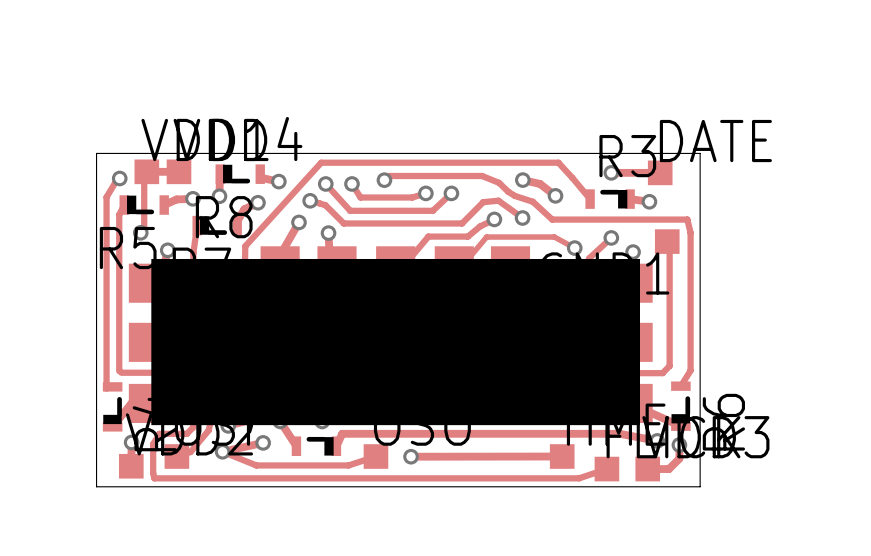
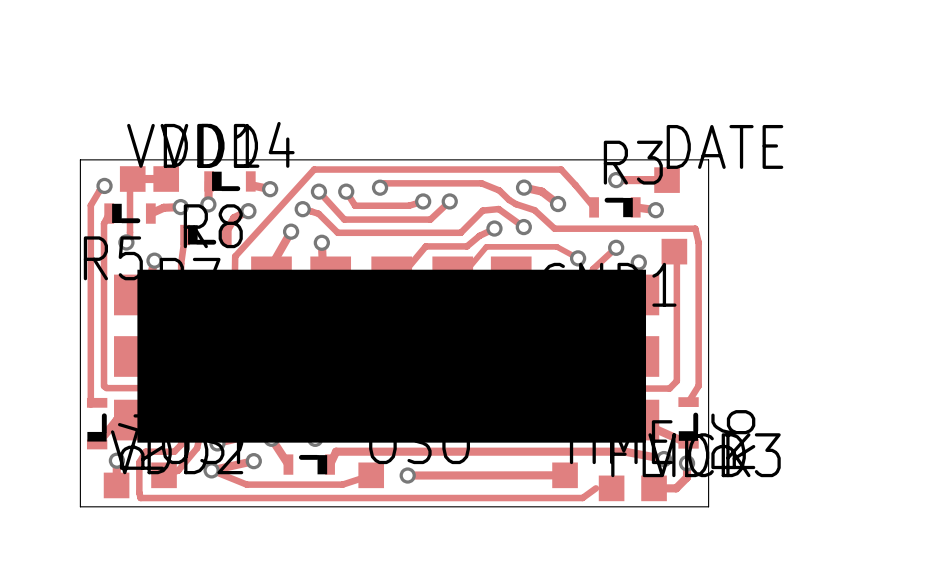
track: (606, 469) (579, 478) -> (595, 488) (582, 498)

